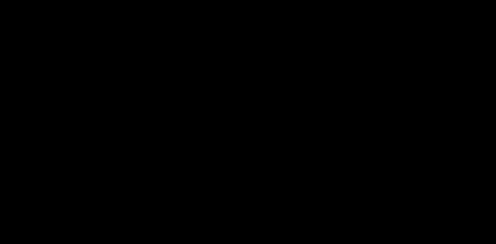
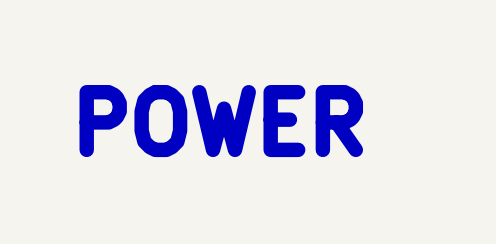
text: none -> POWER (221, 121)

